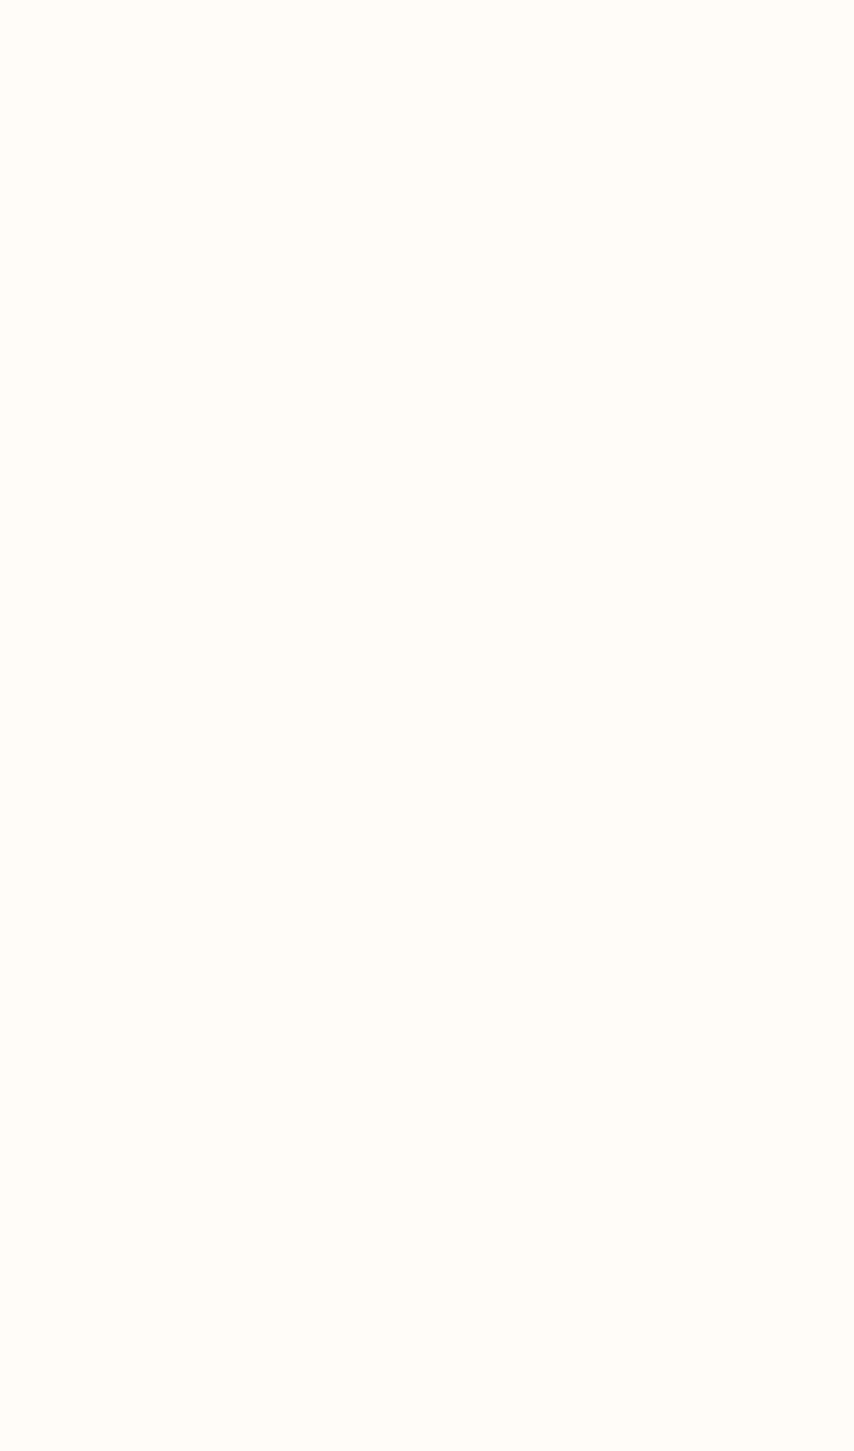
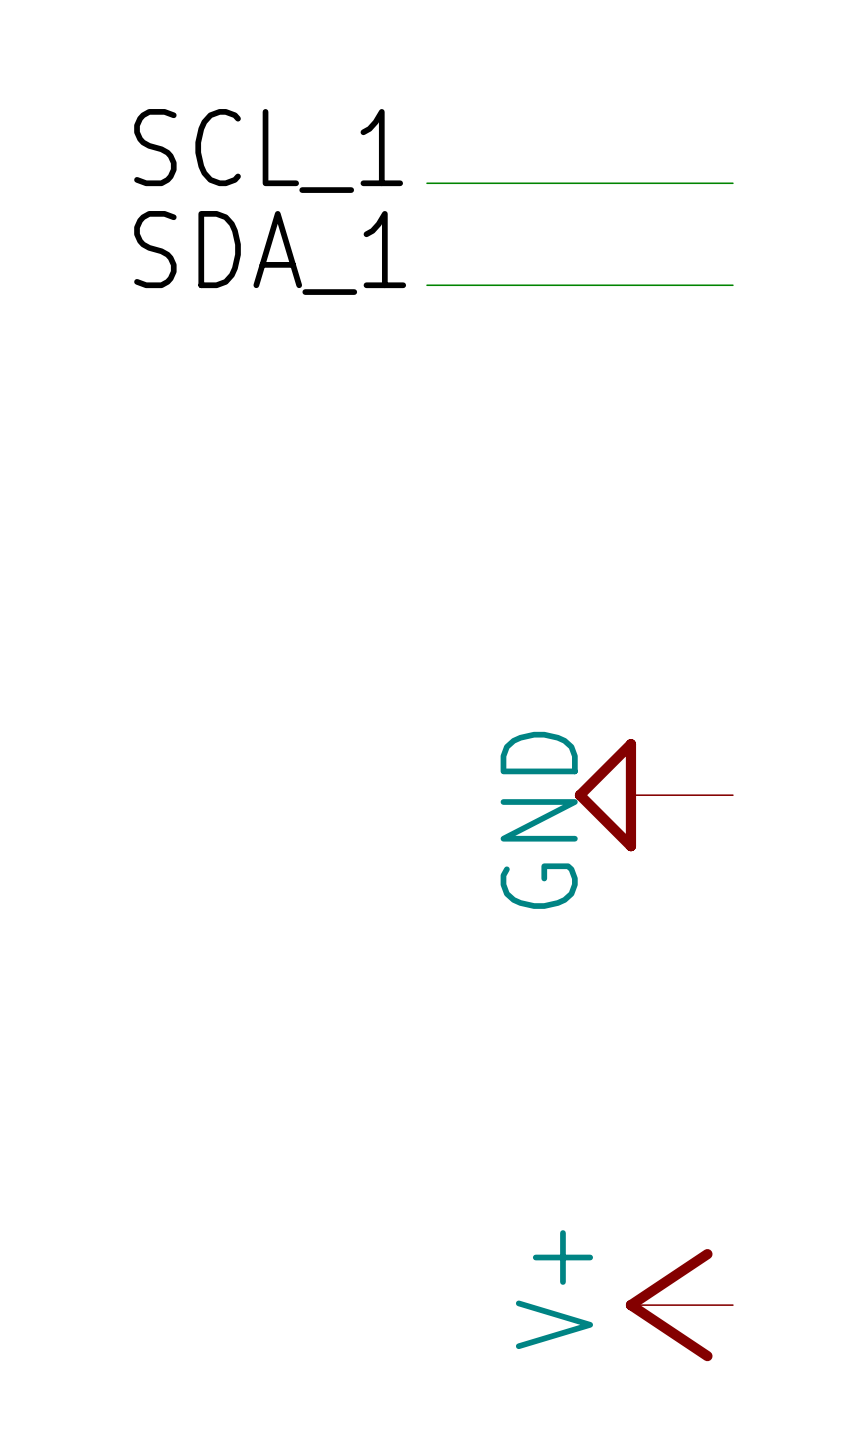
label: none -> SCL_1 (268, 150)
wire: none -> (426, 183) (732, 183)
label: none -> SDA_1 (270, 252)
wire: none -> (426, 285) (732, 285)
power symbol: none -> GND (653, 795)
power symbol: none -> V+ (679, 1305)

